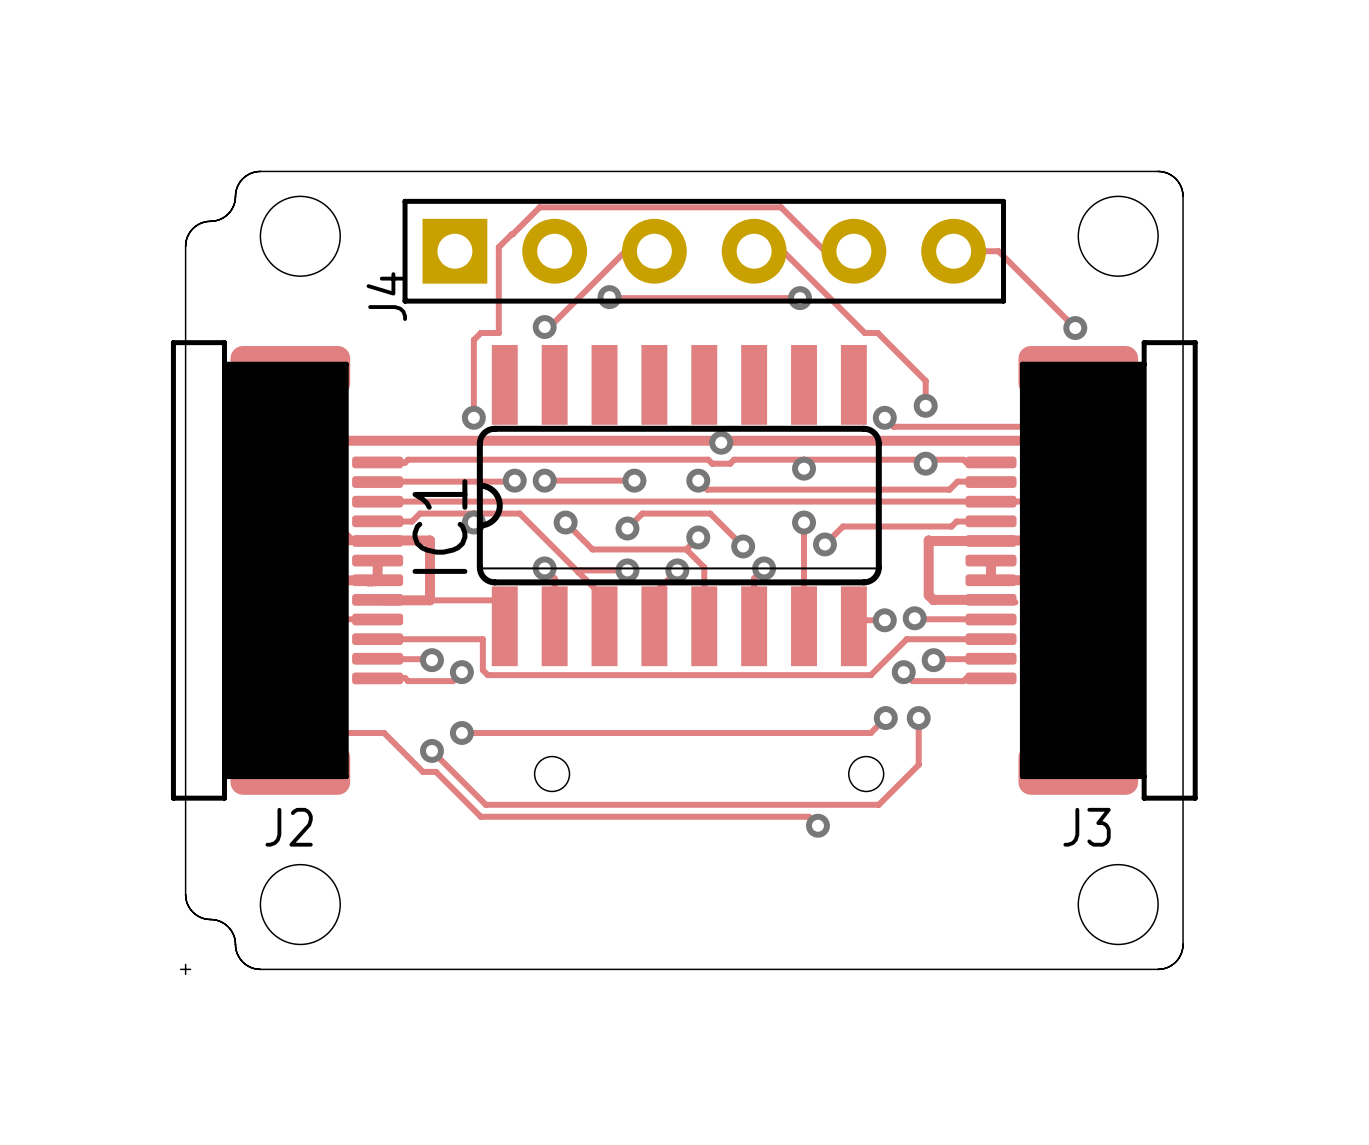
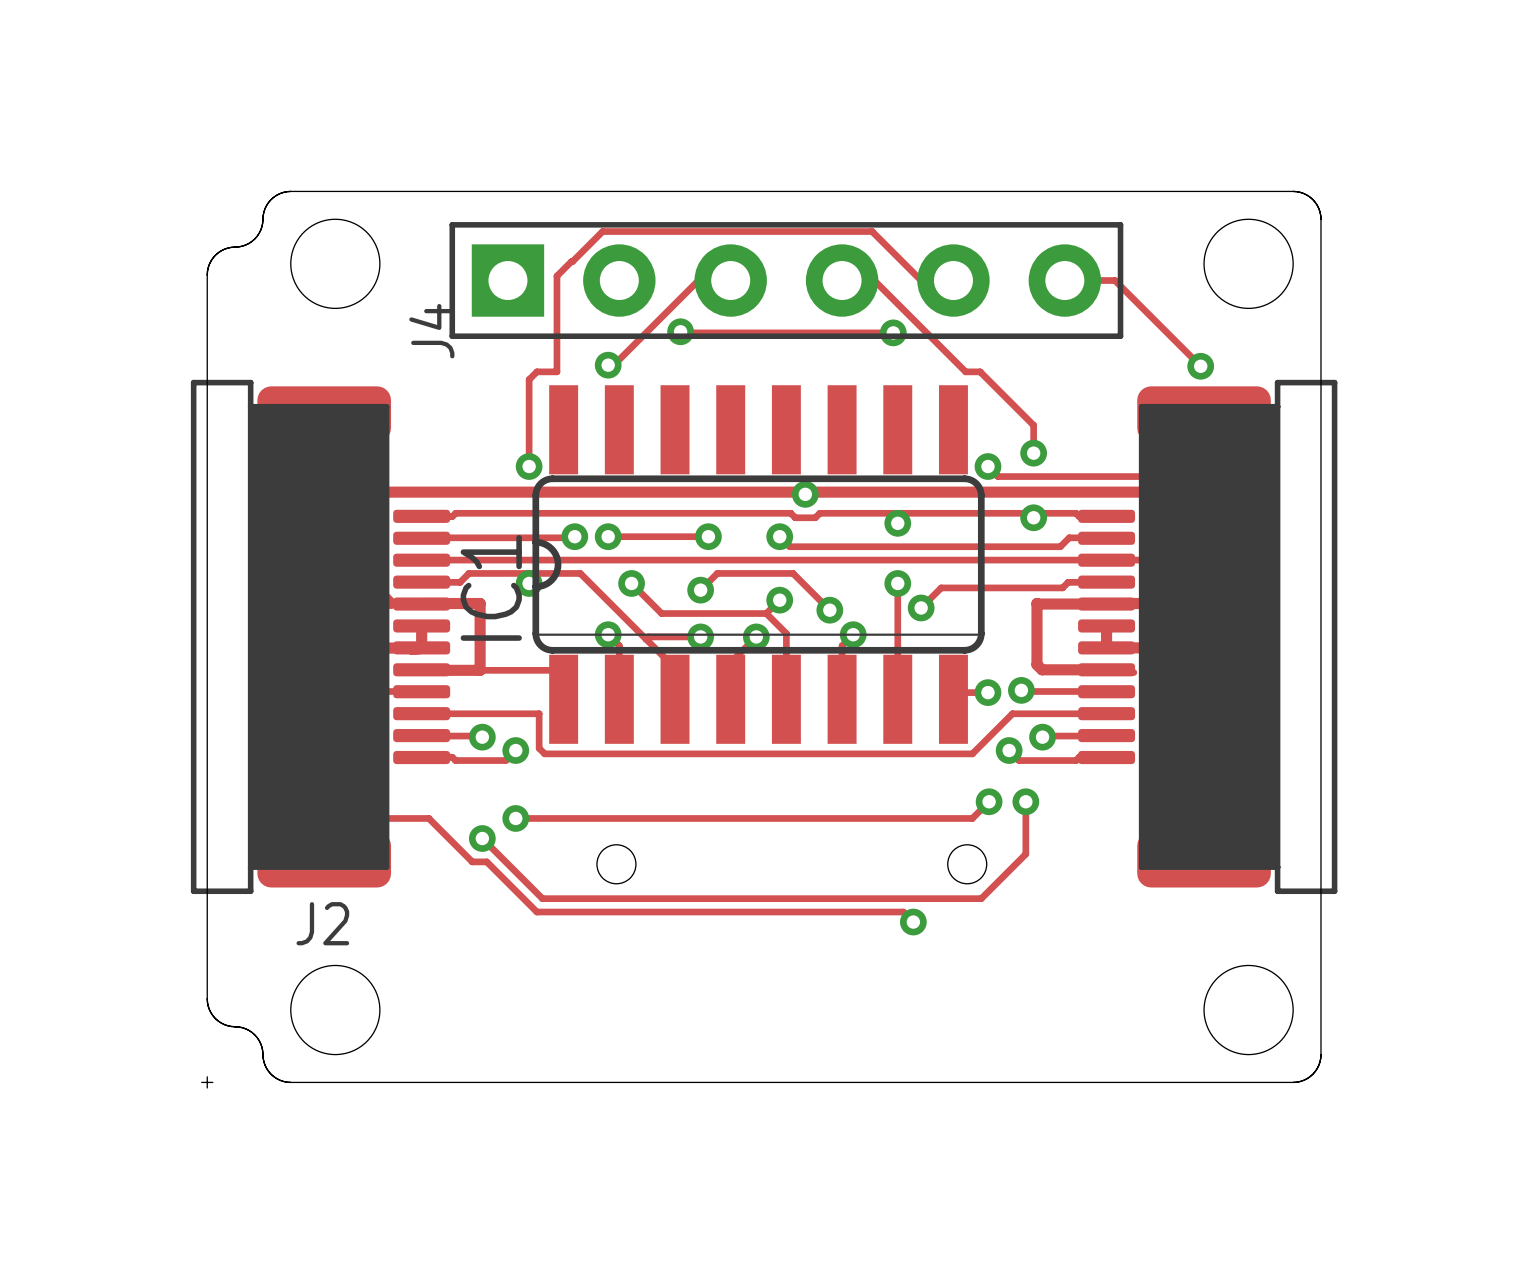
J3 name: J3 (1087, 827) -> none

